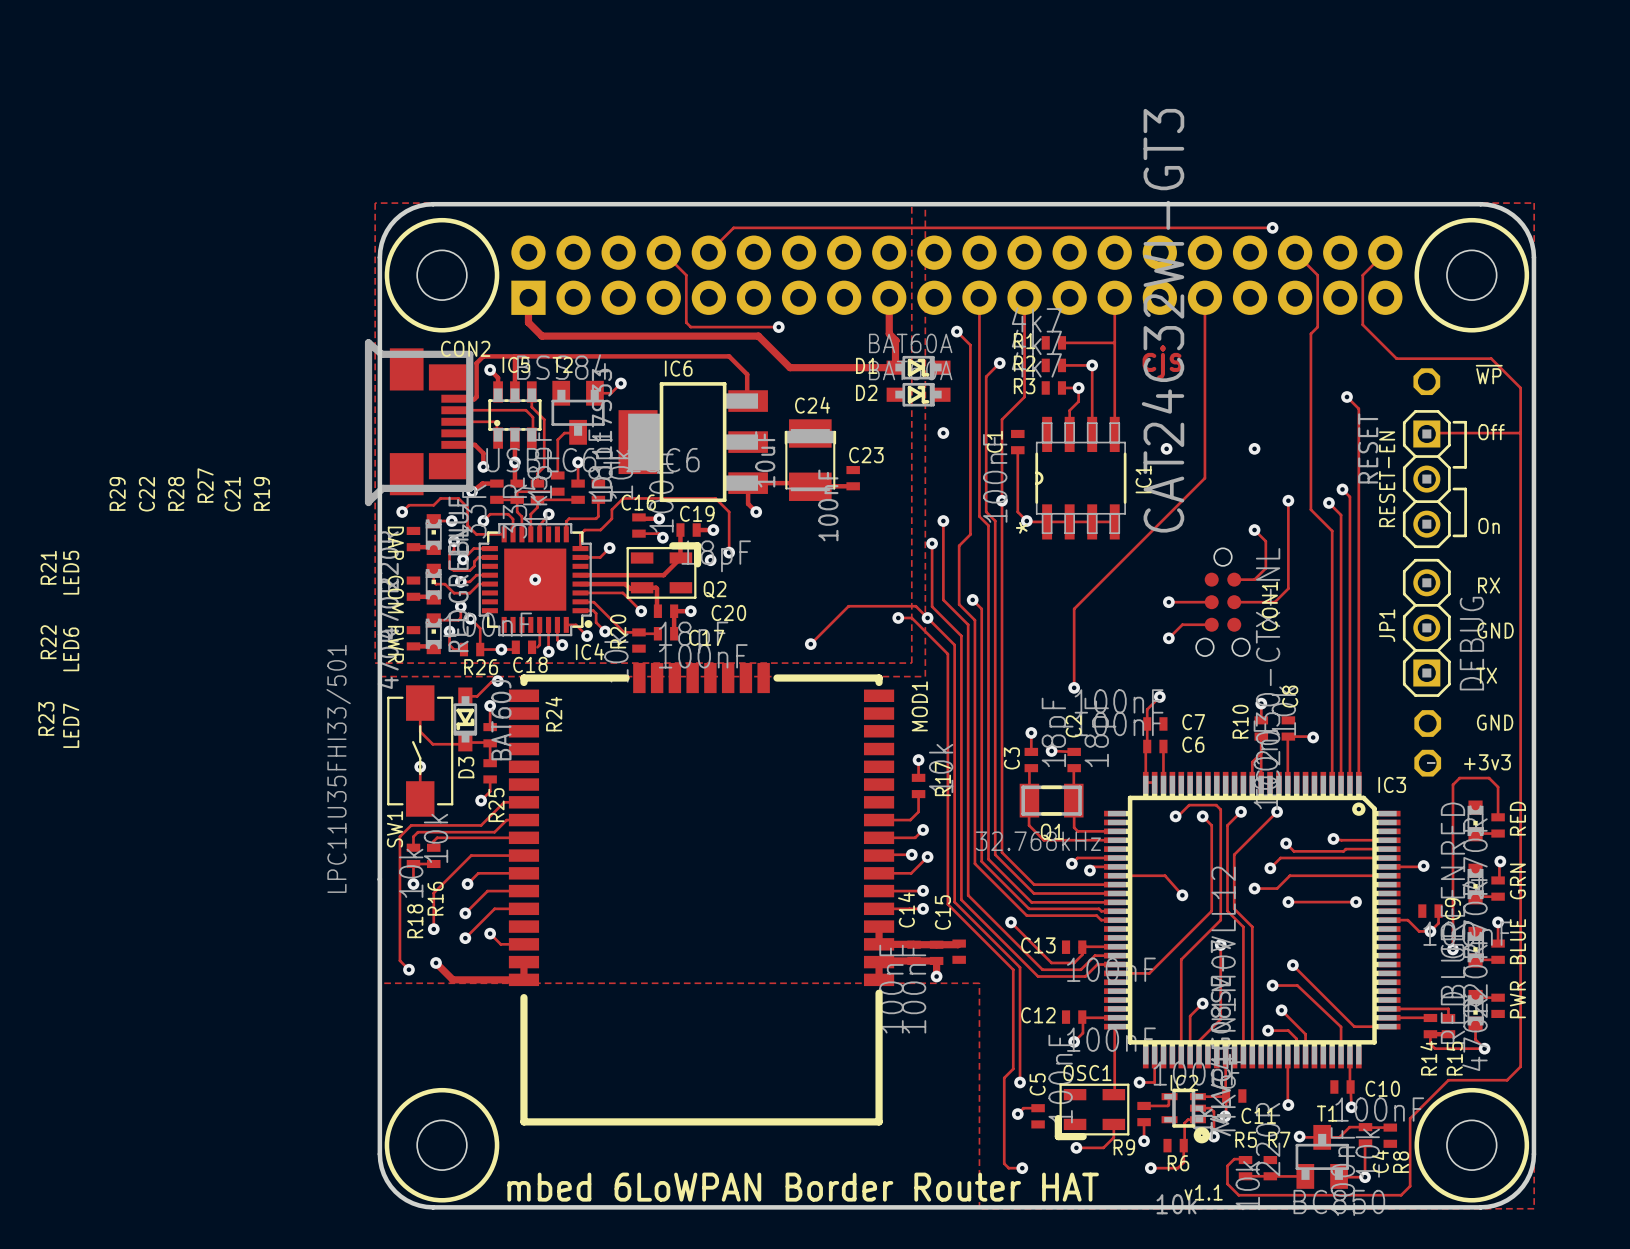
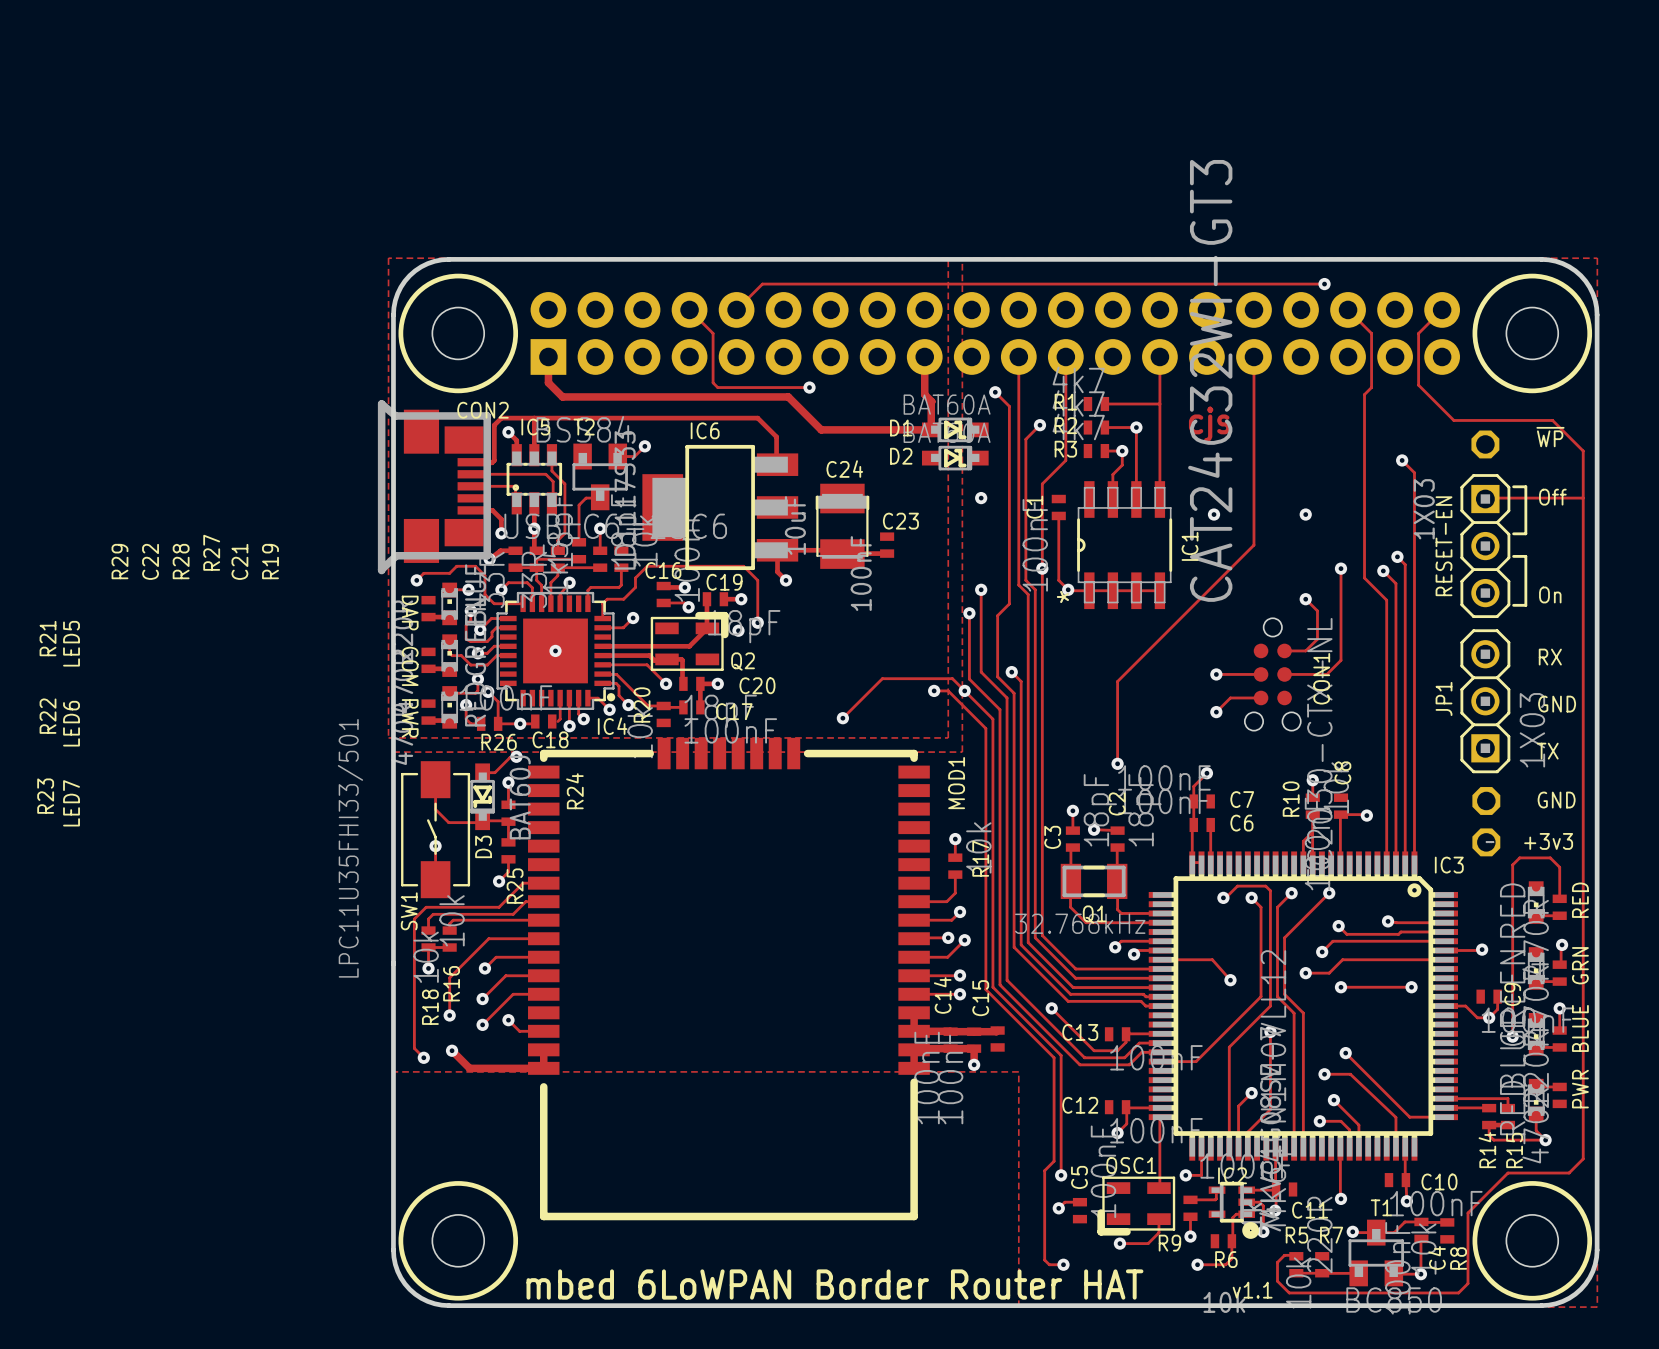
RESET-EN value: RESET (1368, 448) -> 1X03 (1424, 509)
JP1 value: DEBUG (1471, 643) -> 1X03 (1532, 730)

